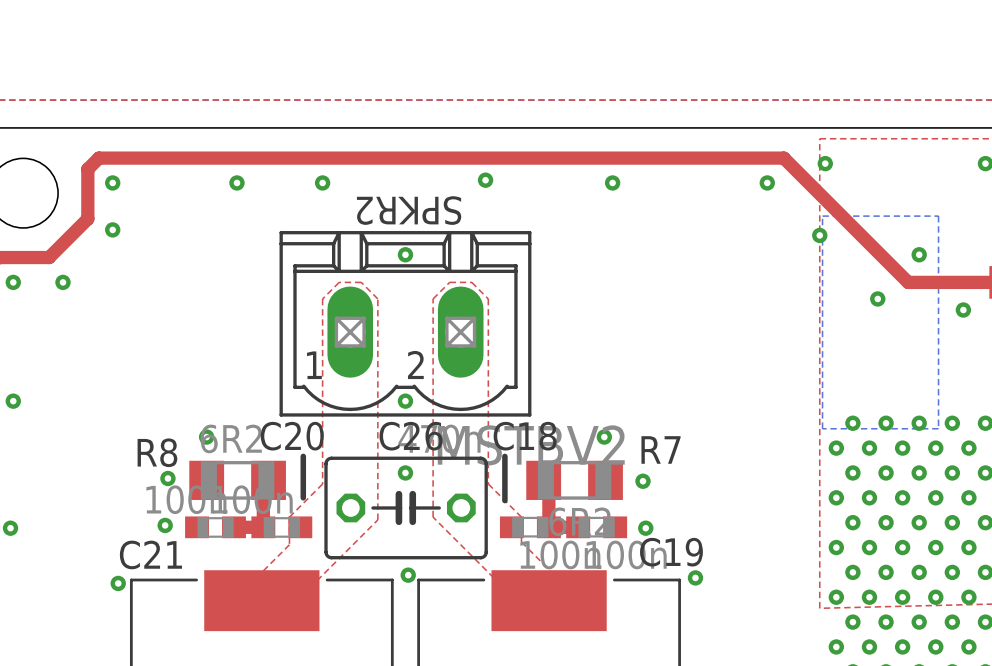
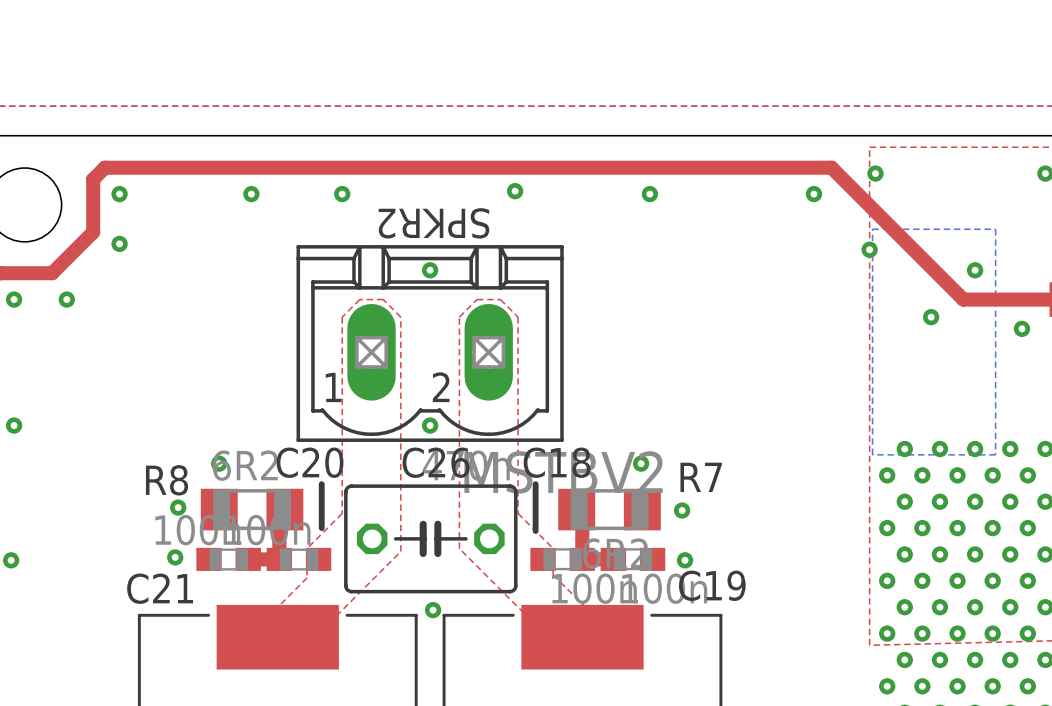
via: (405, 472) -> none
via: (695, 577) -> none
via: (118, 583) -> none

